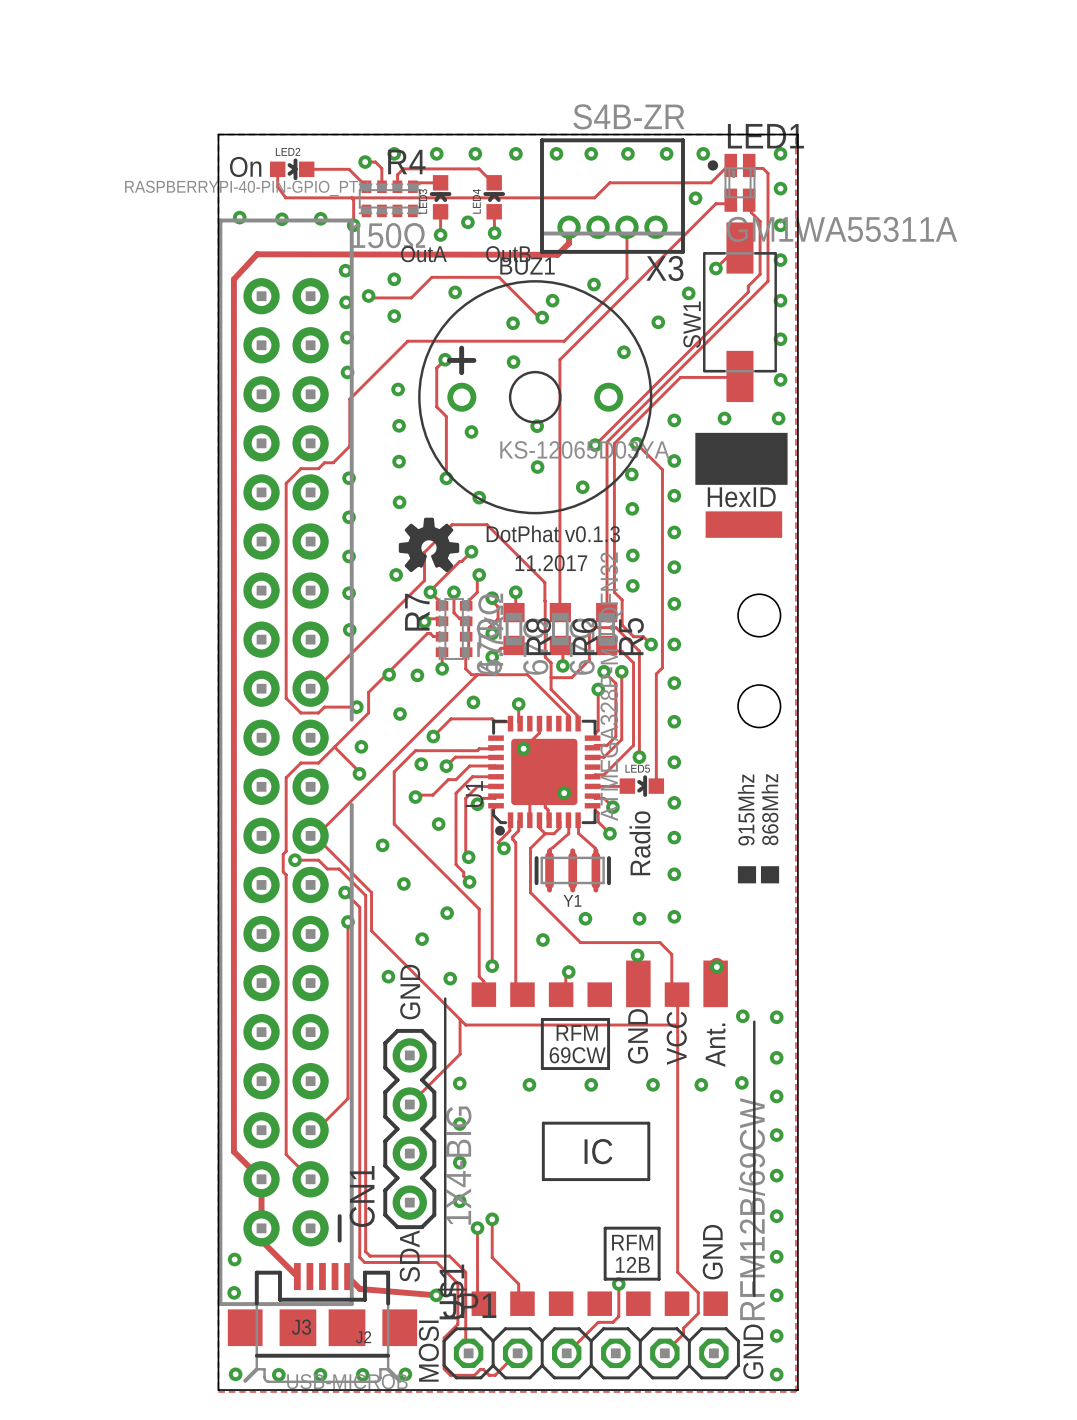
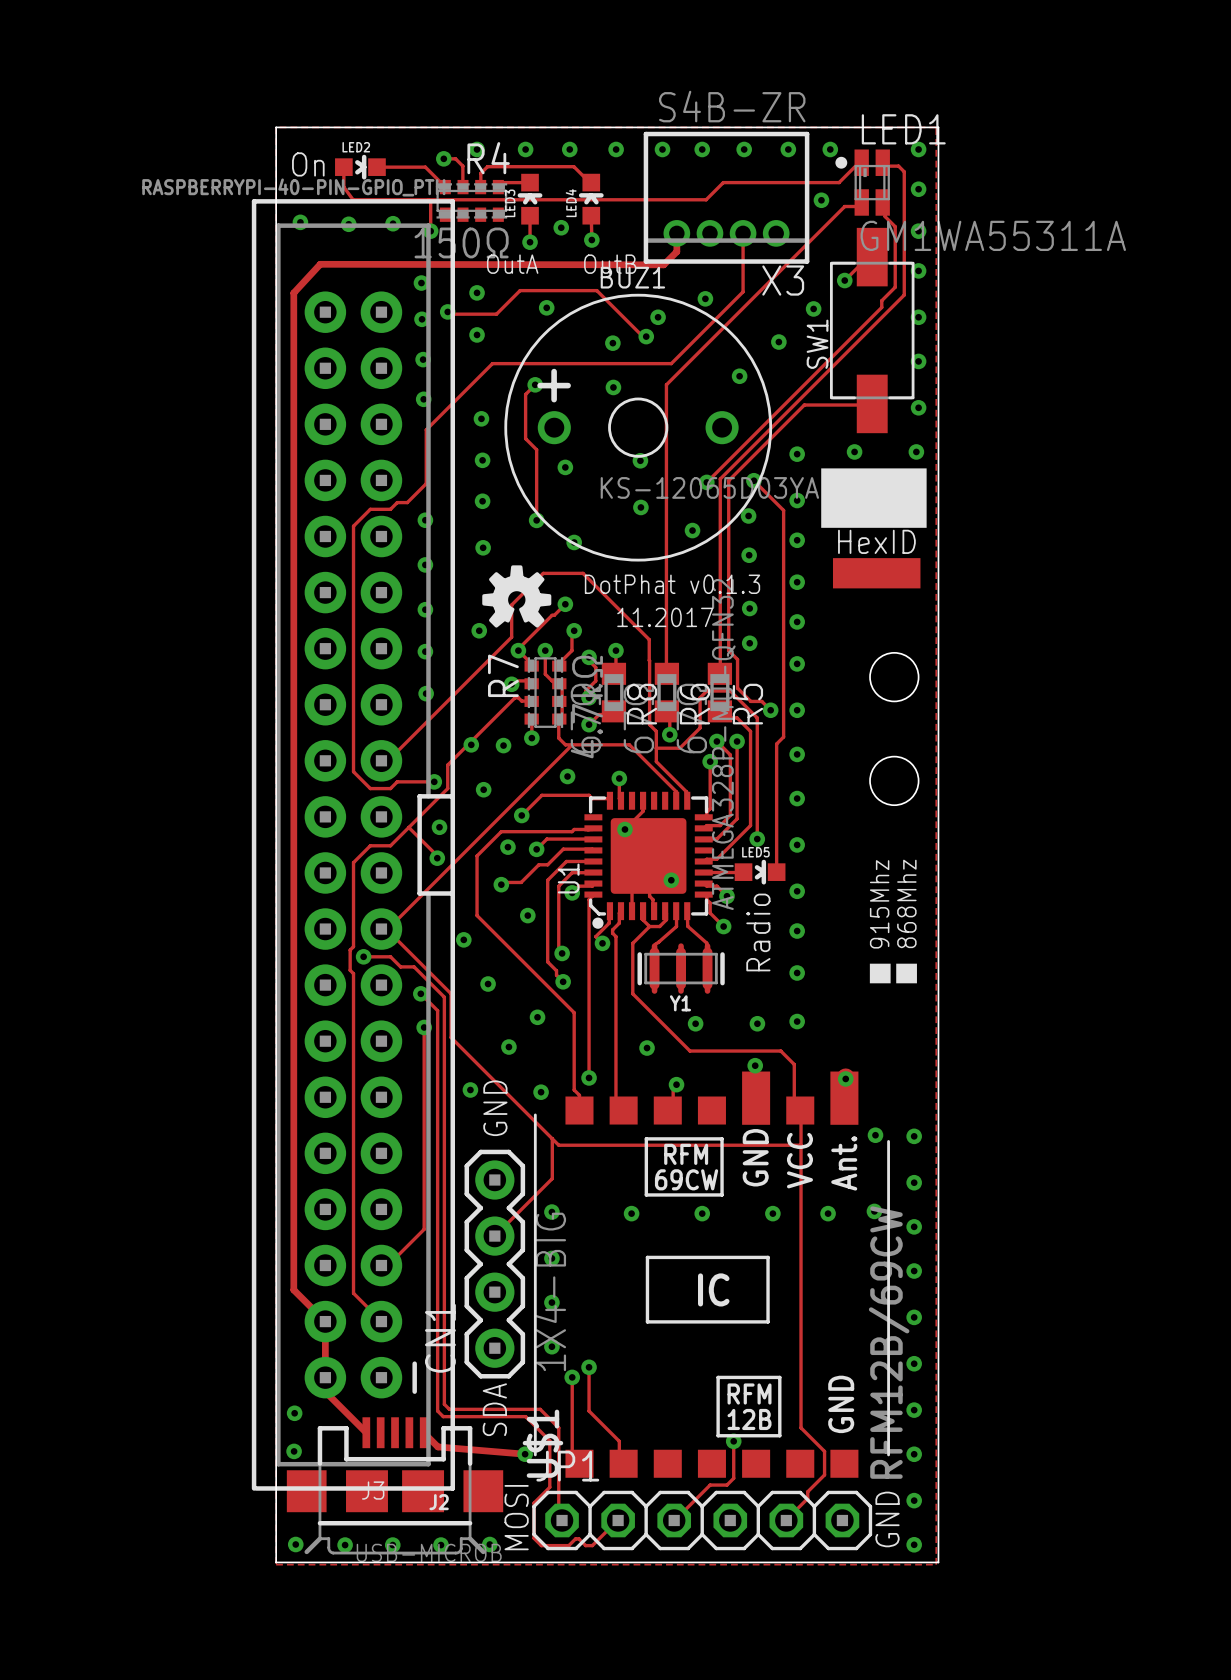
J2 footprint: [218, 218, 354, 1307] -> [251, 199, 456, 1491]

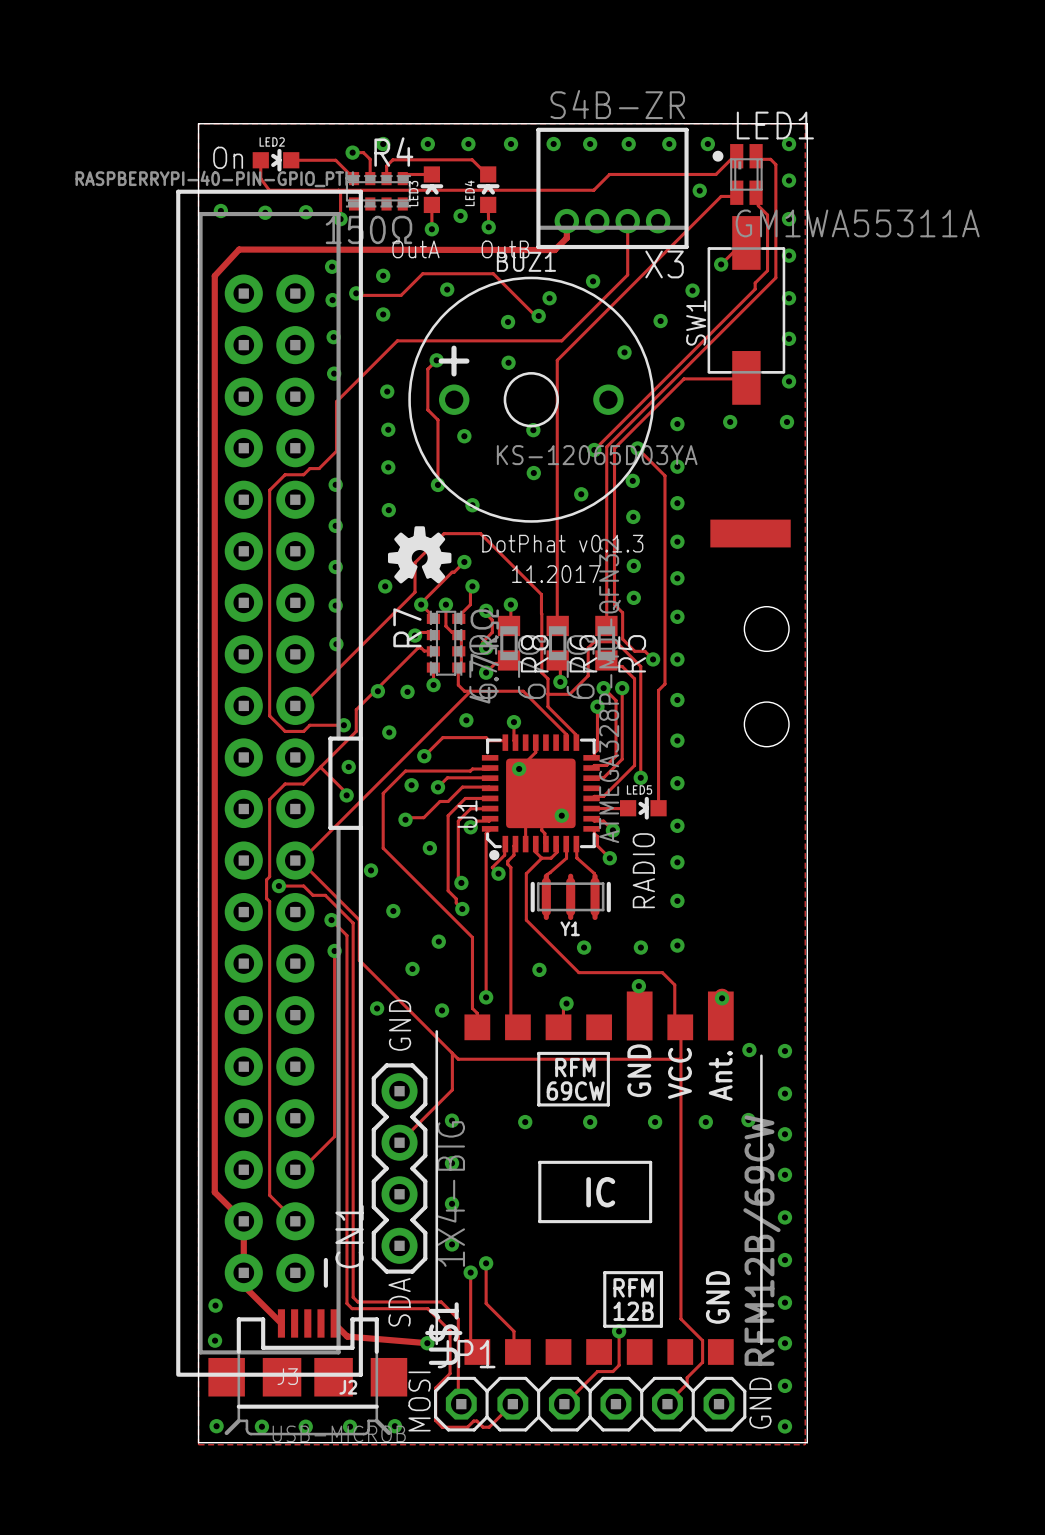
drawing: [821, 468, 927, 528] -> none
text: HexID (876, 541) -> none
text: 868Mhz (906, 903) -> none
text: 915Mhz (879, 904) -> none
text: Radio (758, 932) -> RADIO (643, 870)
drawing: [869, 963, 917, 984] -> none

